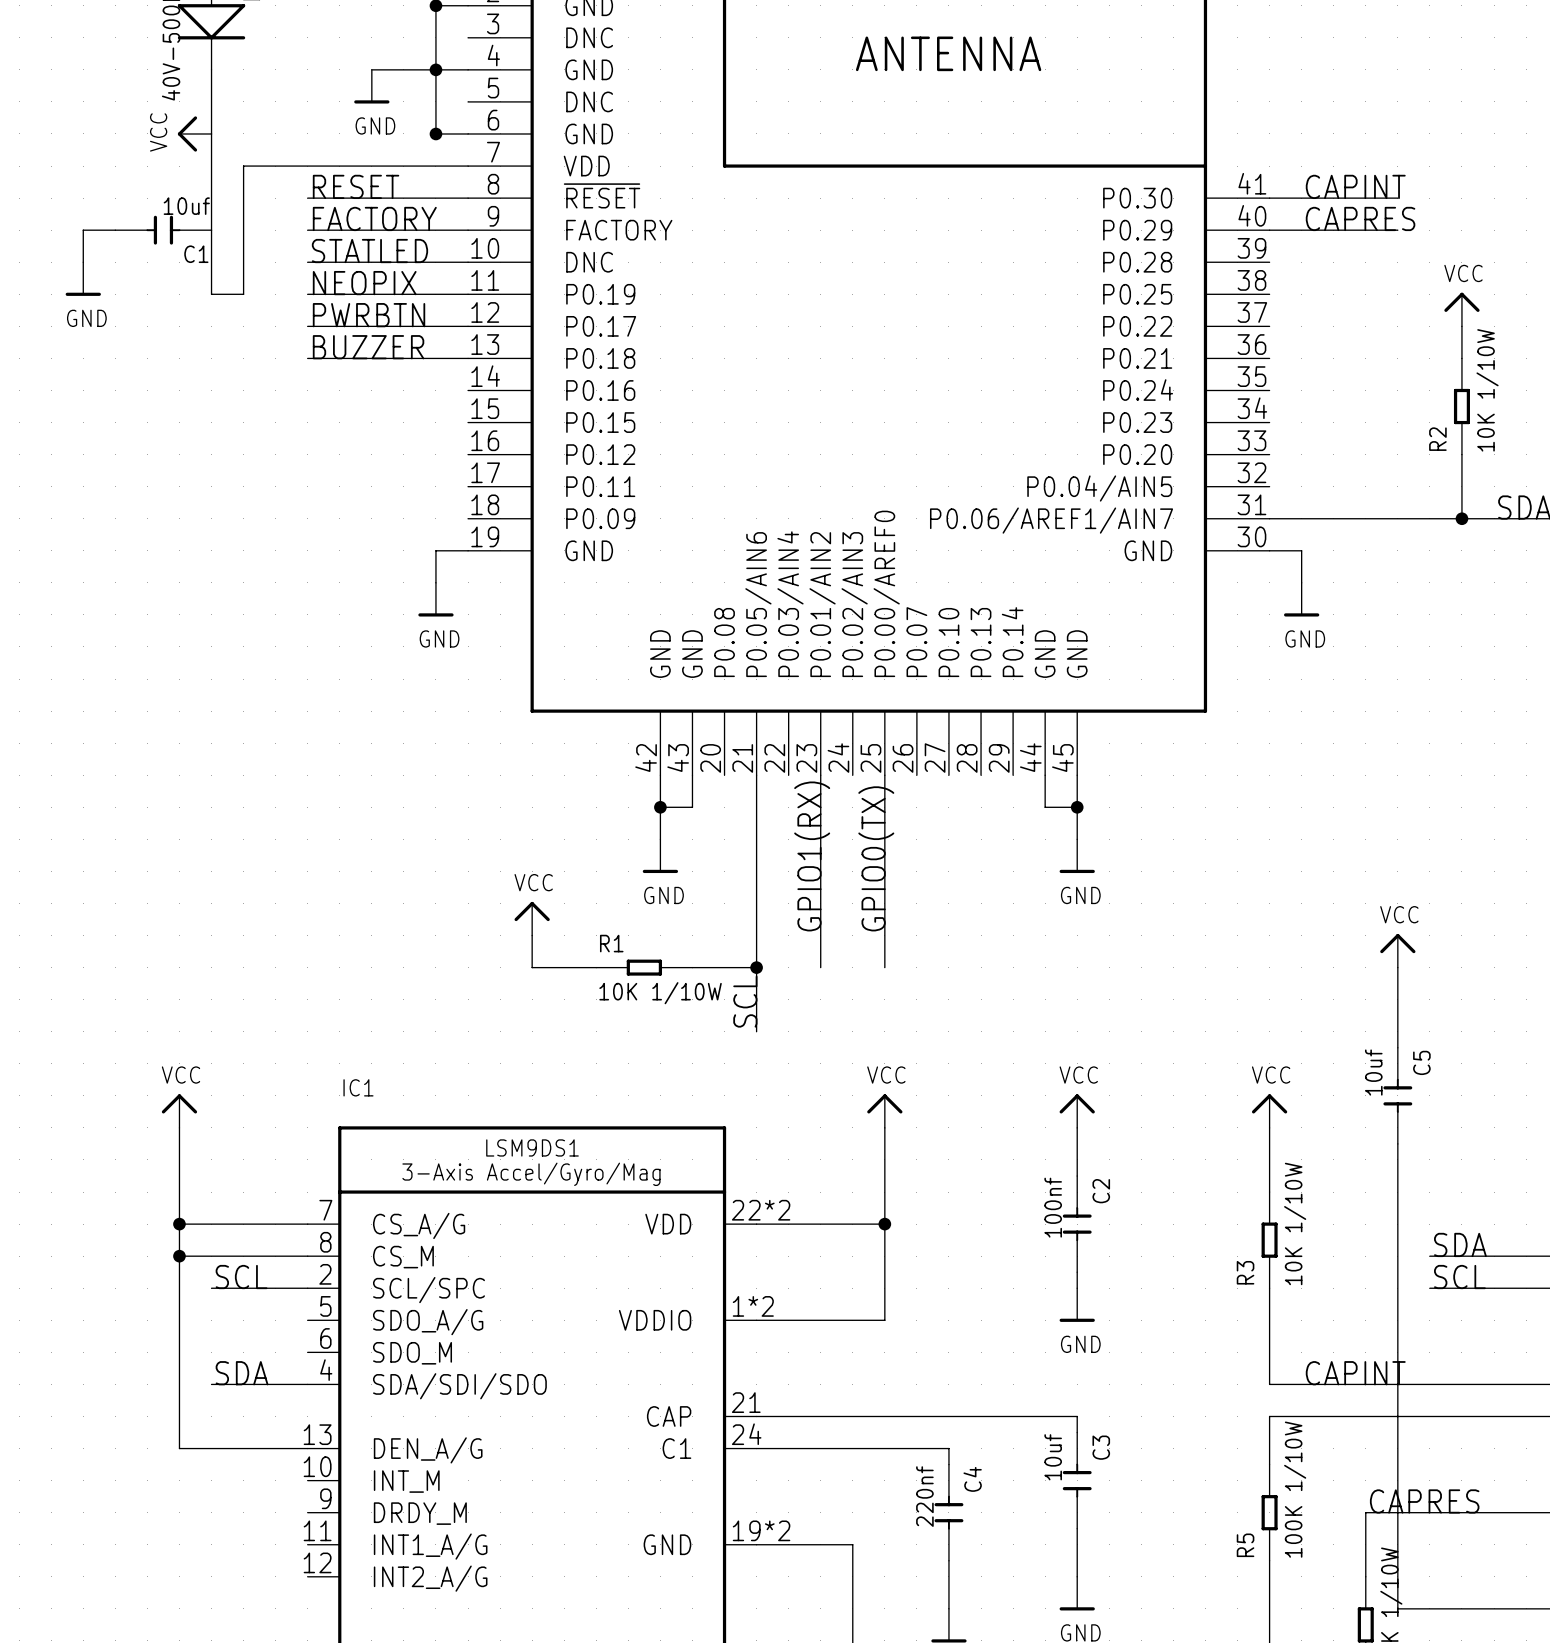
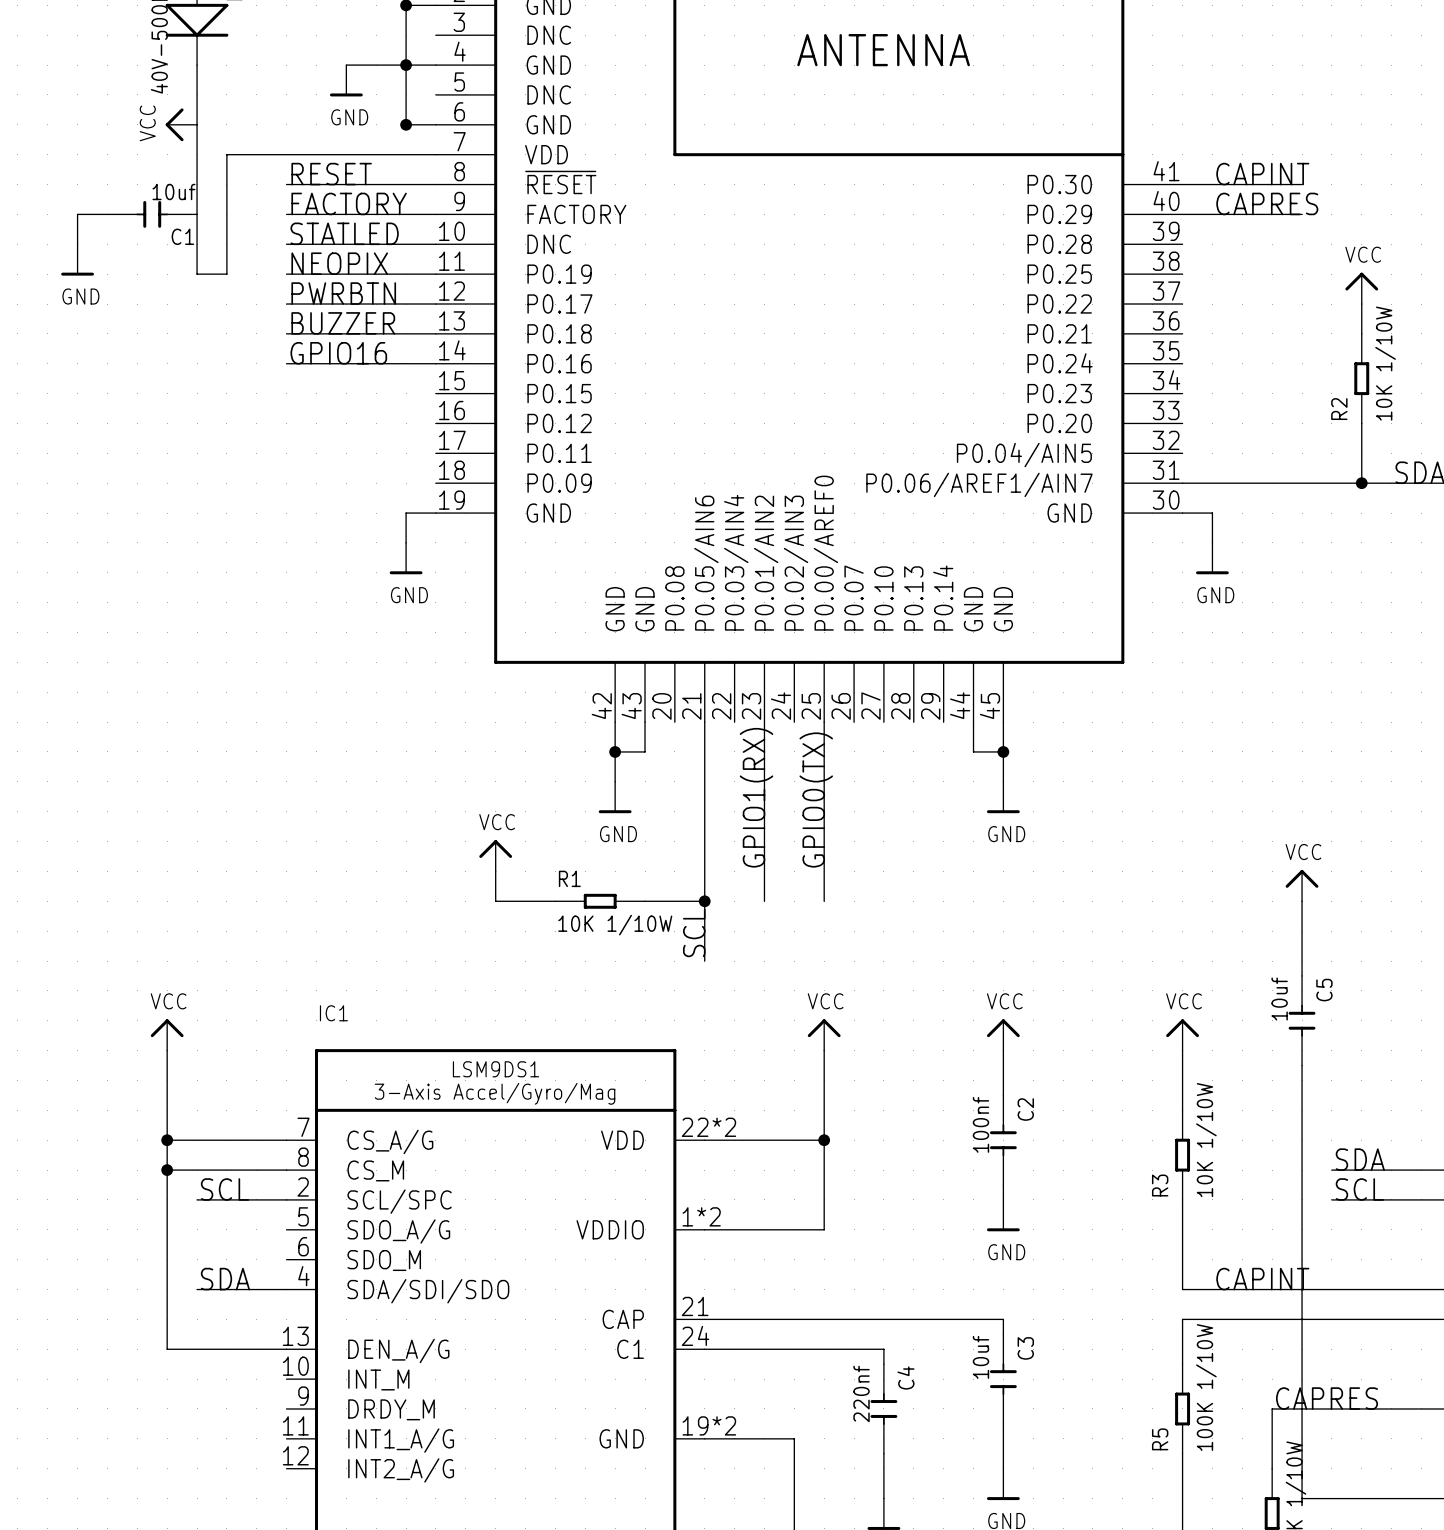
label: none -> GPIO16 (338, 353)
wire: none -> (286, 363) (435, 363)

